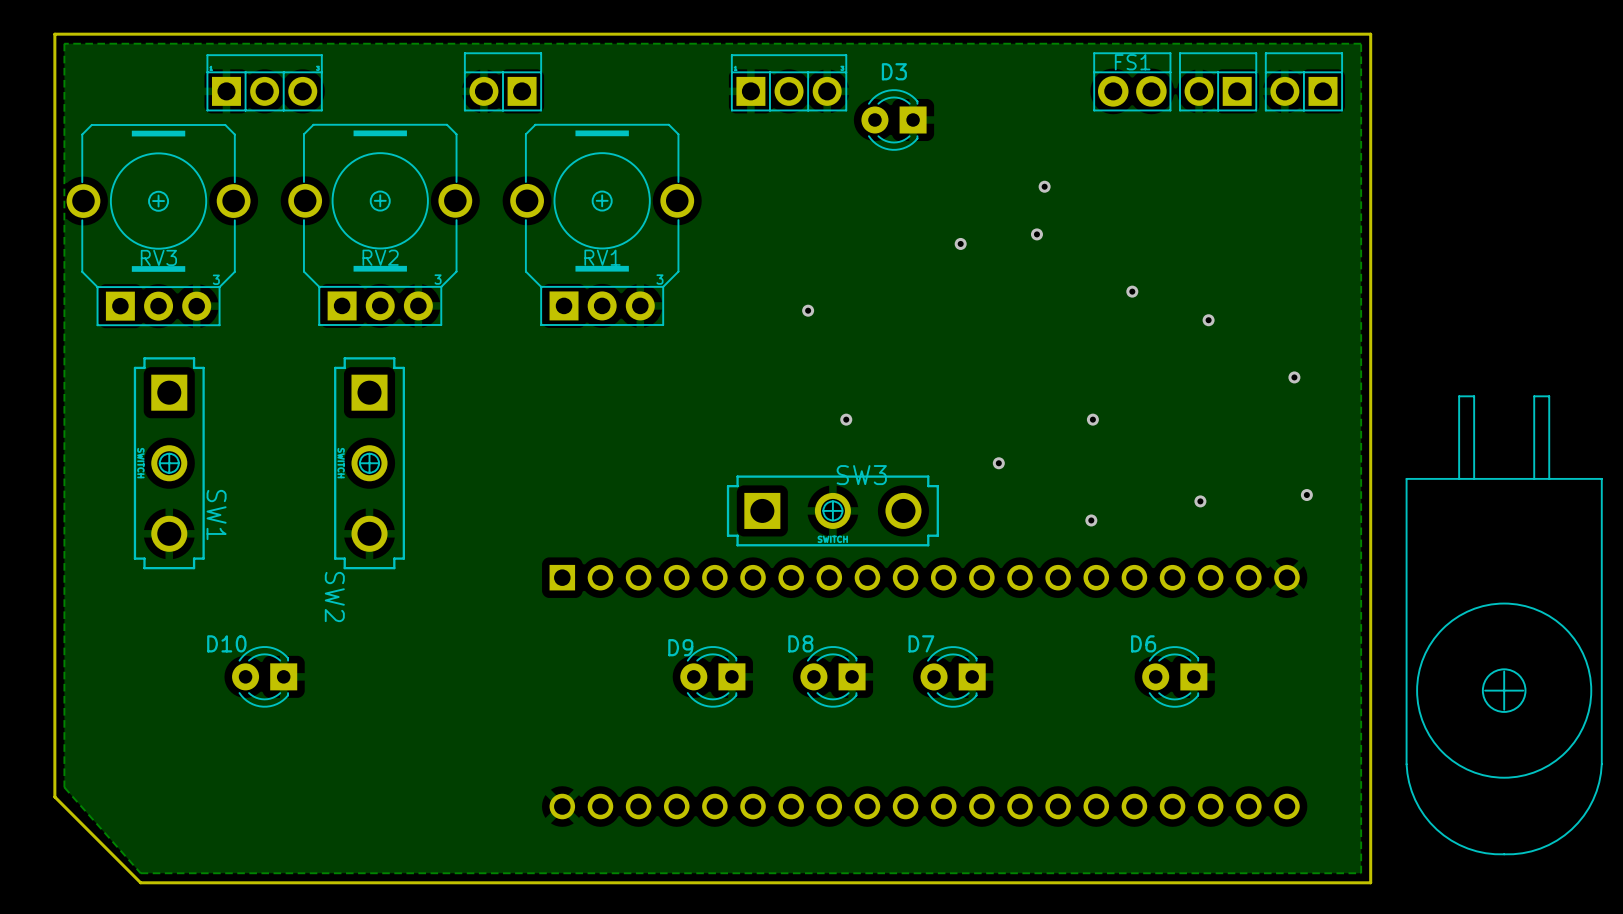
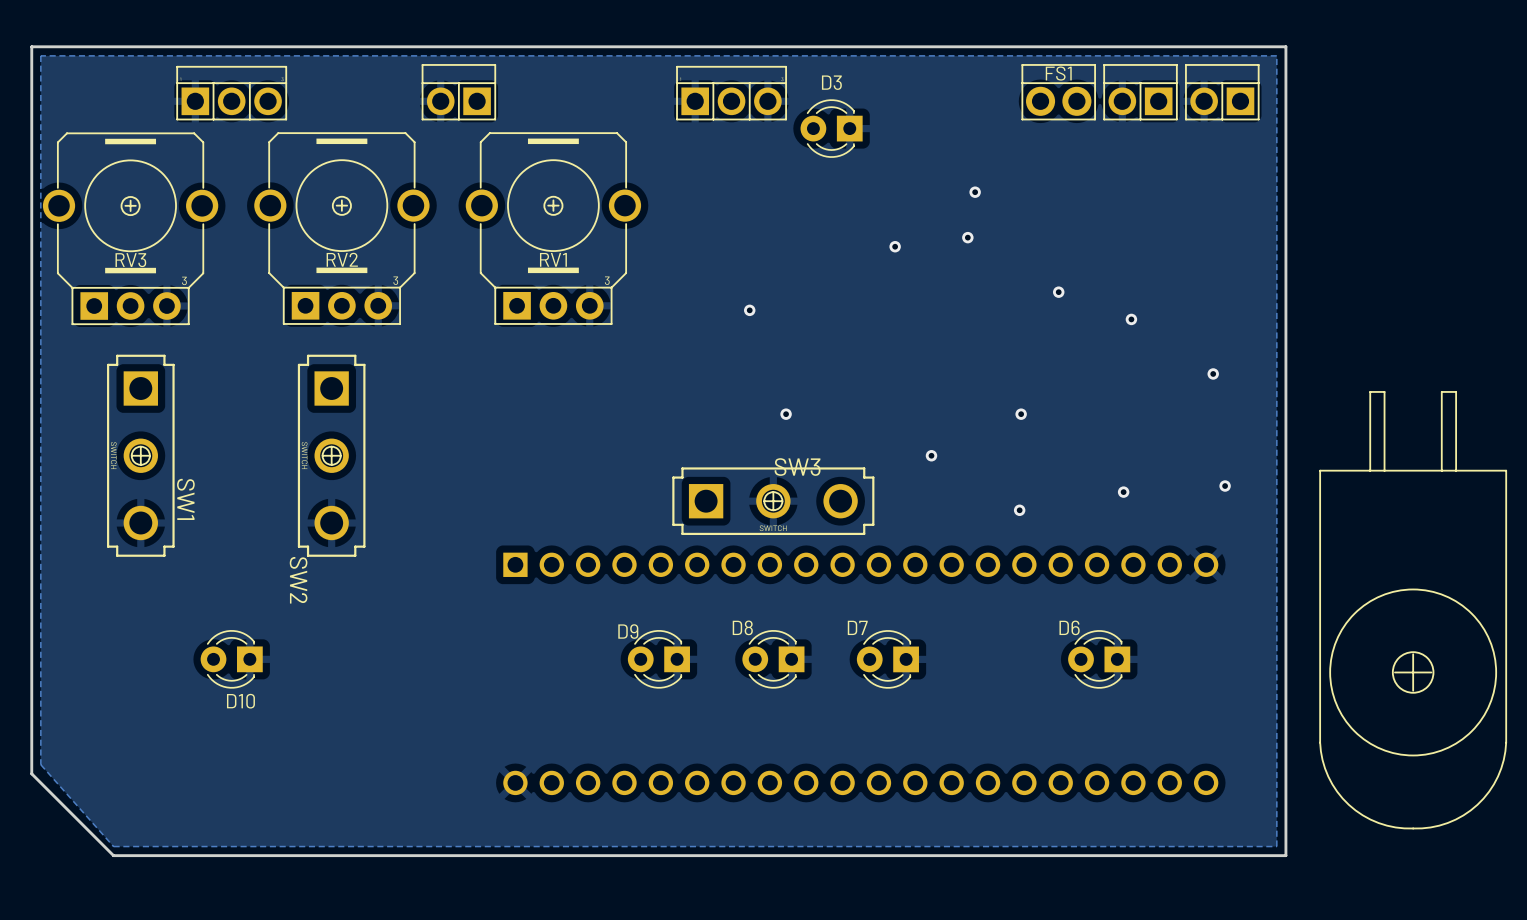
D10 name position: D10 (226, 643) -> D10 (240, 701)

